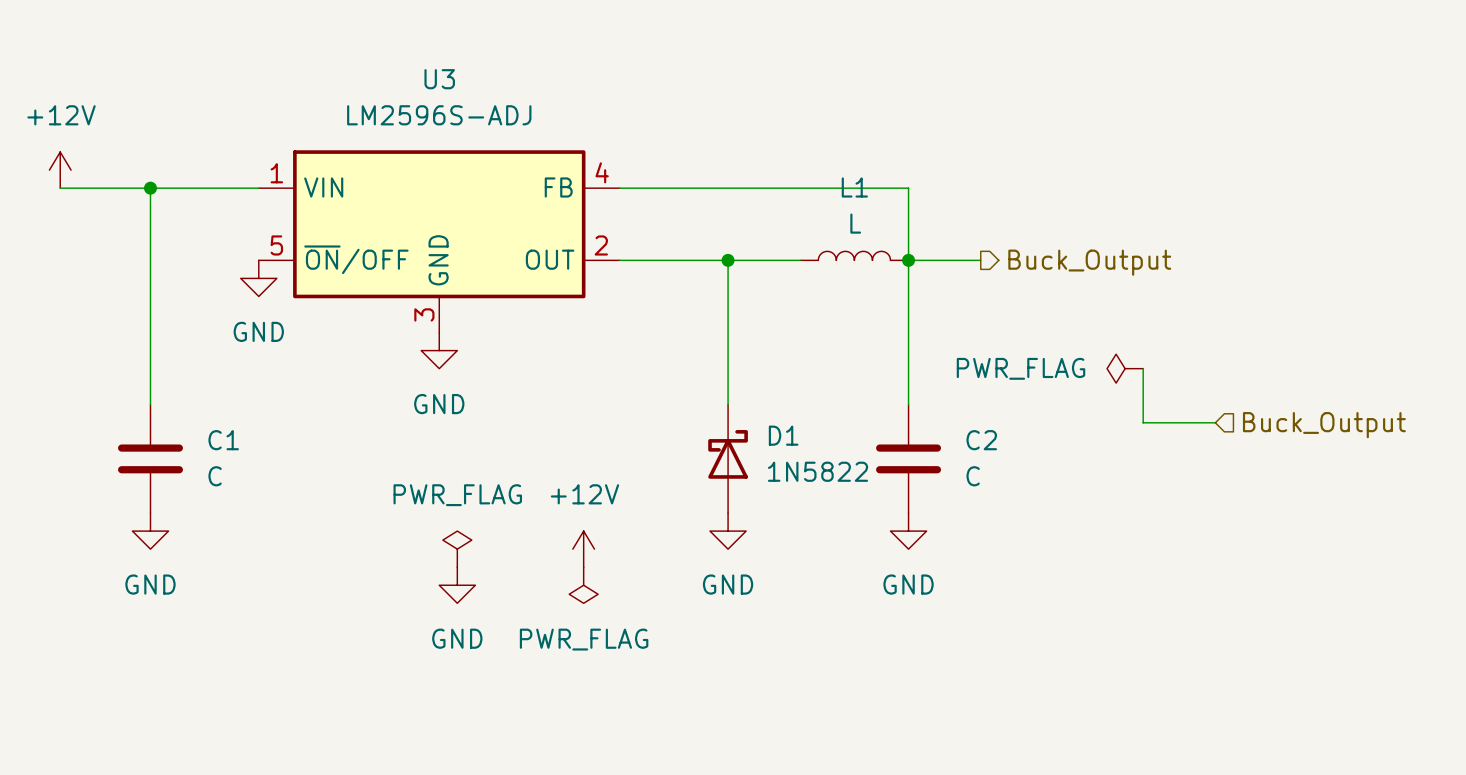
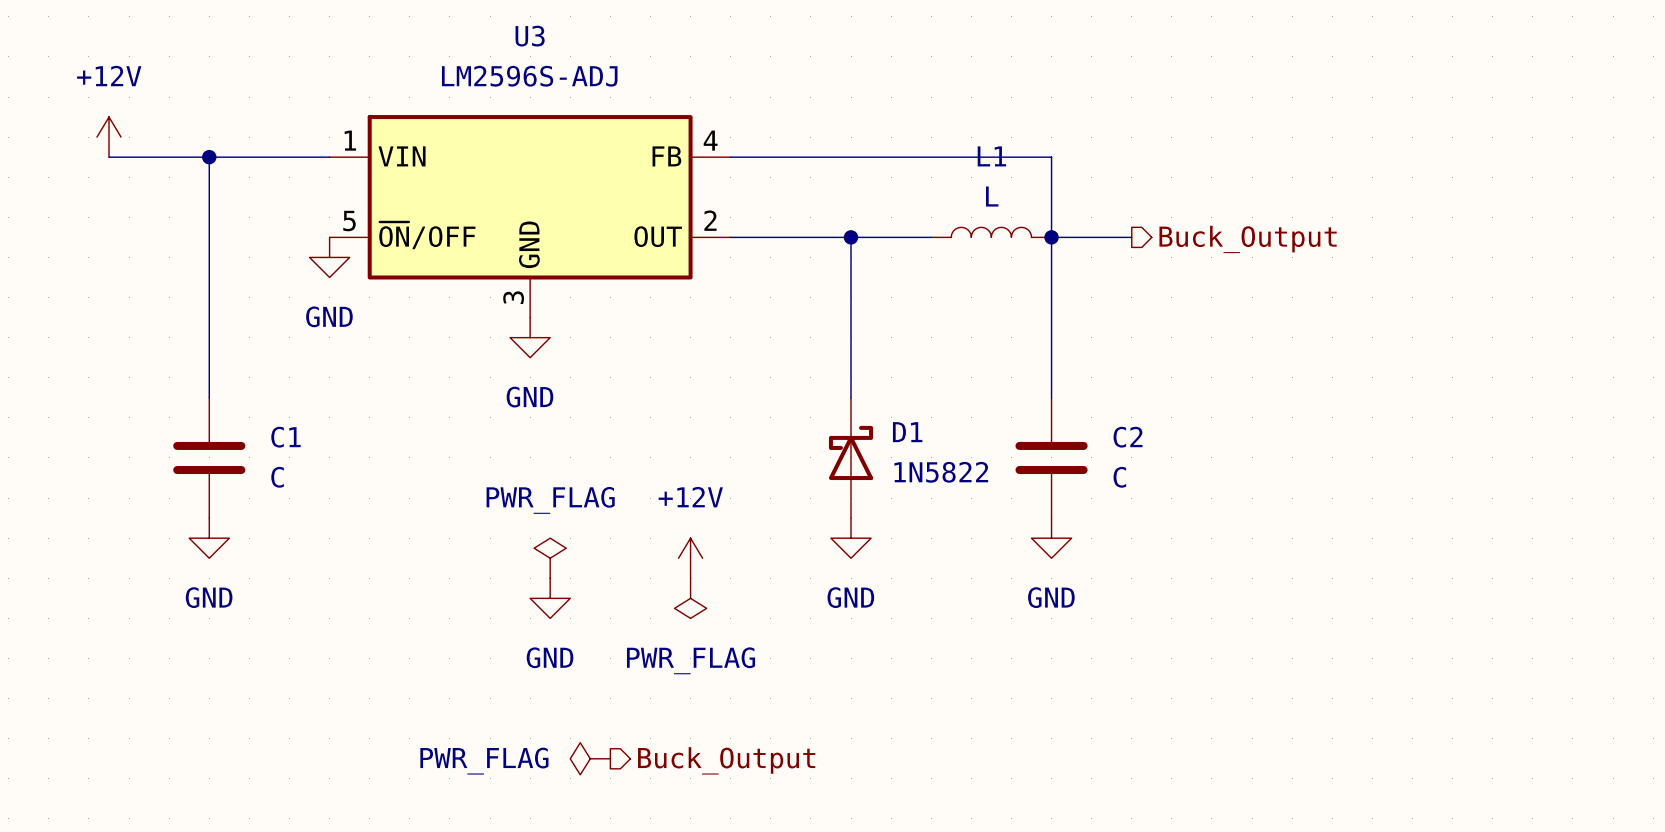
power symbol: PWR_FLAG (1125, 368) -> none
wire: (1143, 368) (1143, 422) (1215, 422) -> none
hierarchical label: Buck_Output (1324, 425) -> none
power symbol: none -> PWR_FLAG (590, 758)
hierarchical label: none -> Buck_Output (726, 760)

